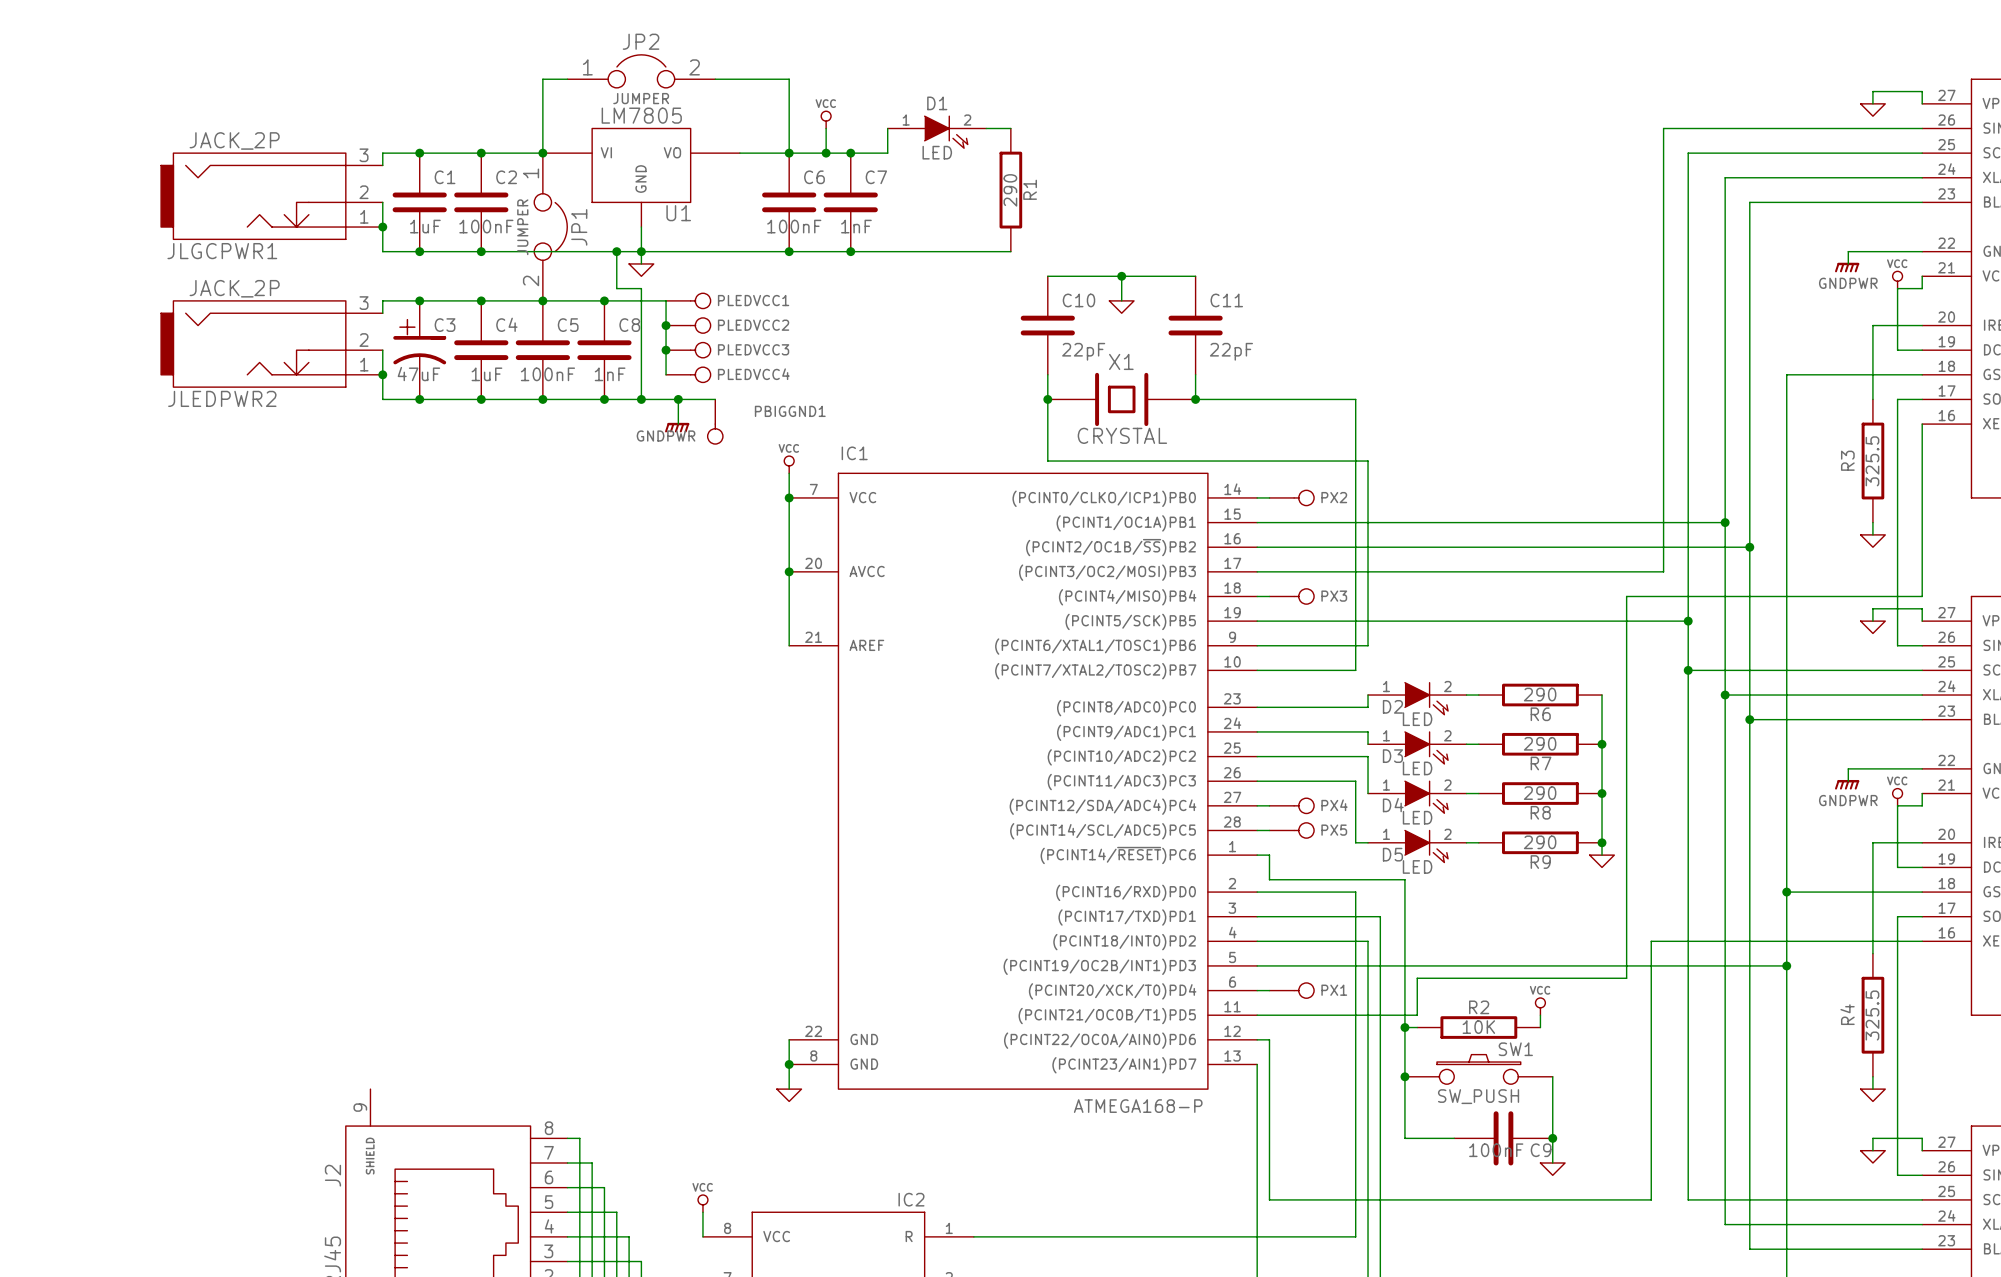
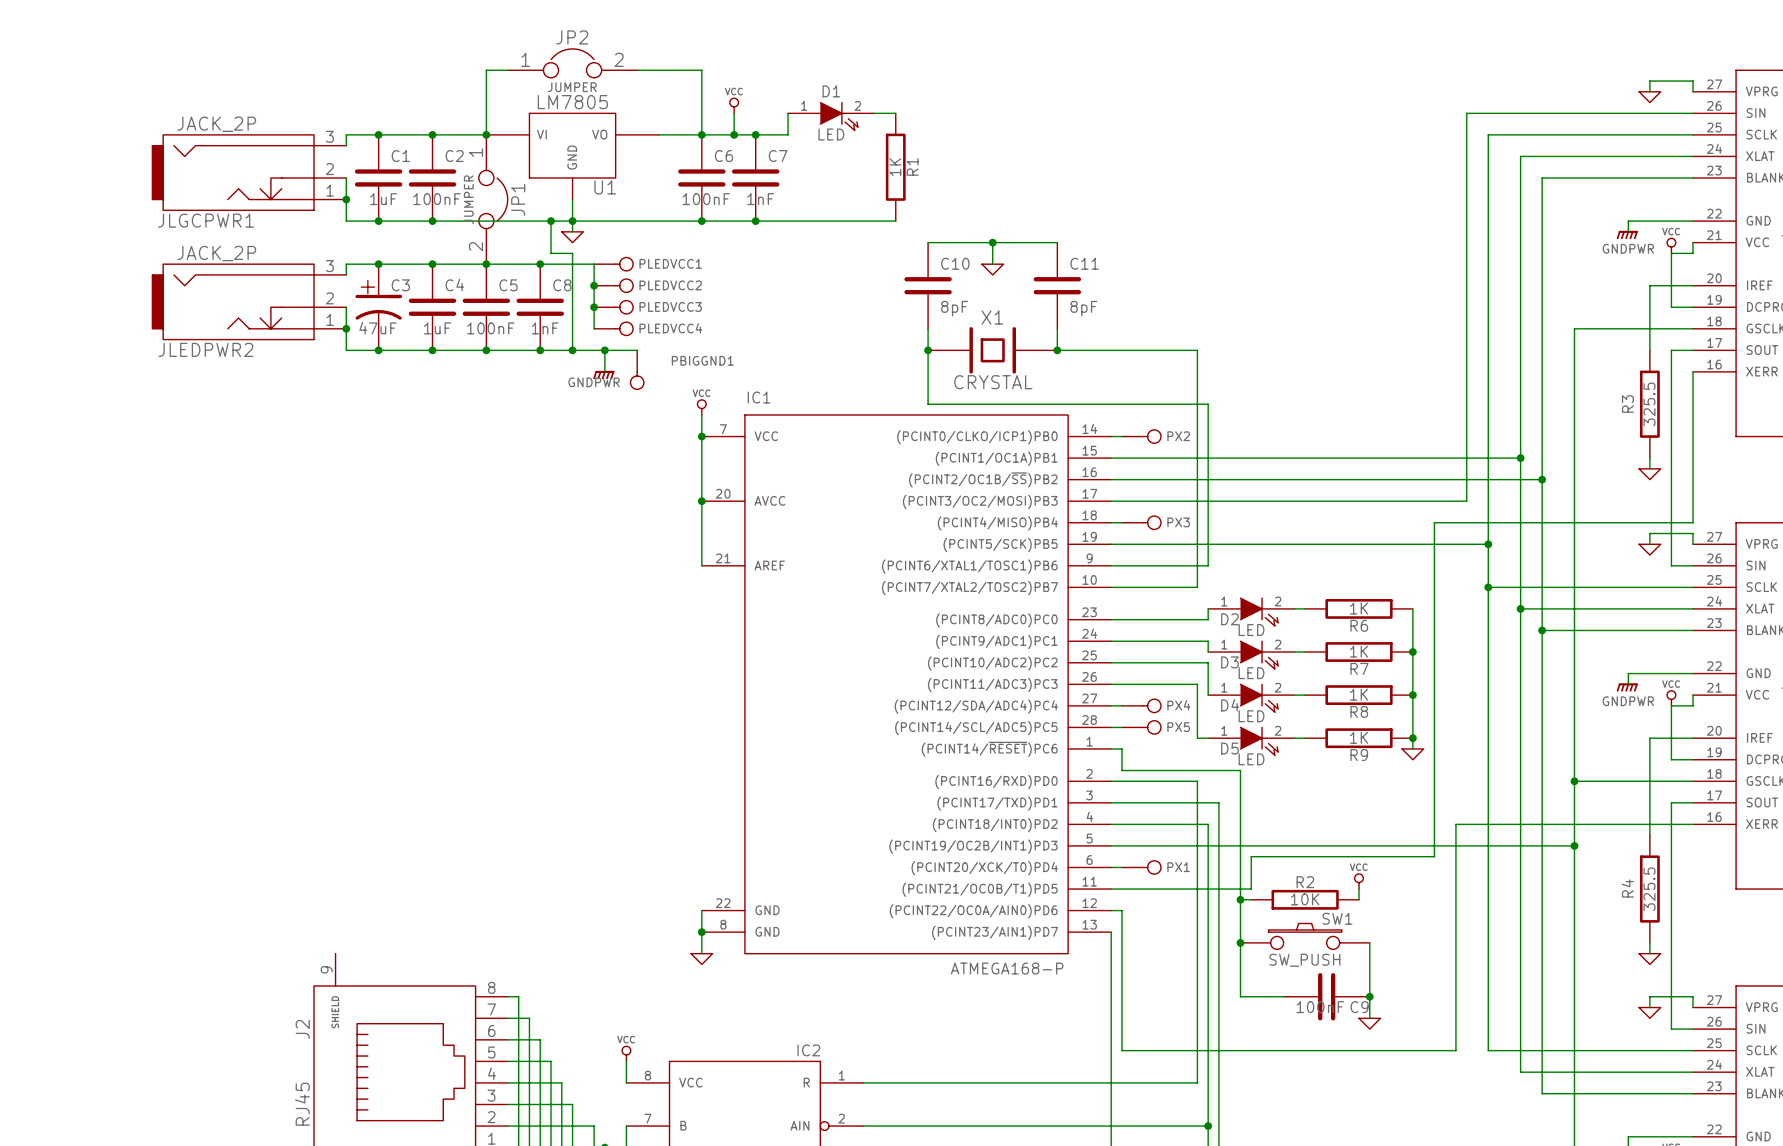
R1 value: 290 (1010, 190) -> 1K (895, 167)
C10 value: 22pF (1083, 351) -> 8pF (954, 308)
C11 value: 22pF (1231, 351) -> 8pF (1083, 308)
R6 value: 290 (1540, 694) -> 1K (1359, 608)
R7 value: 290 (1540, 743) -> 1K (1359, 651)
R8 value: 290 (1540, 793) -> 1K (1359, 694)
R9 value: 290 (1540, 842) -> 1K (1359, 737)

